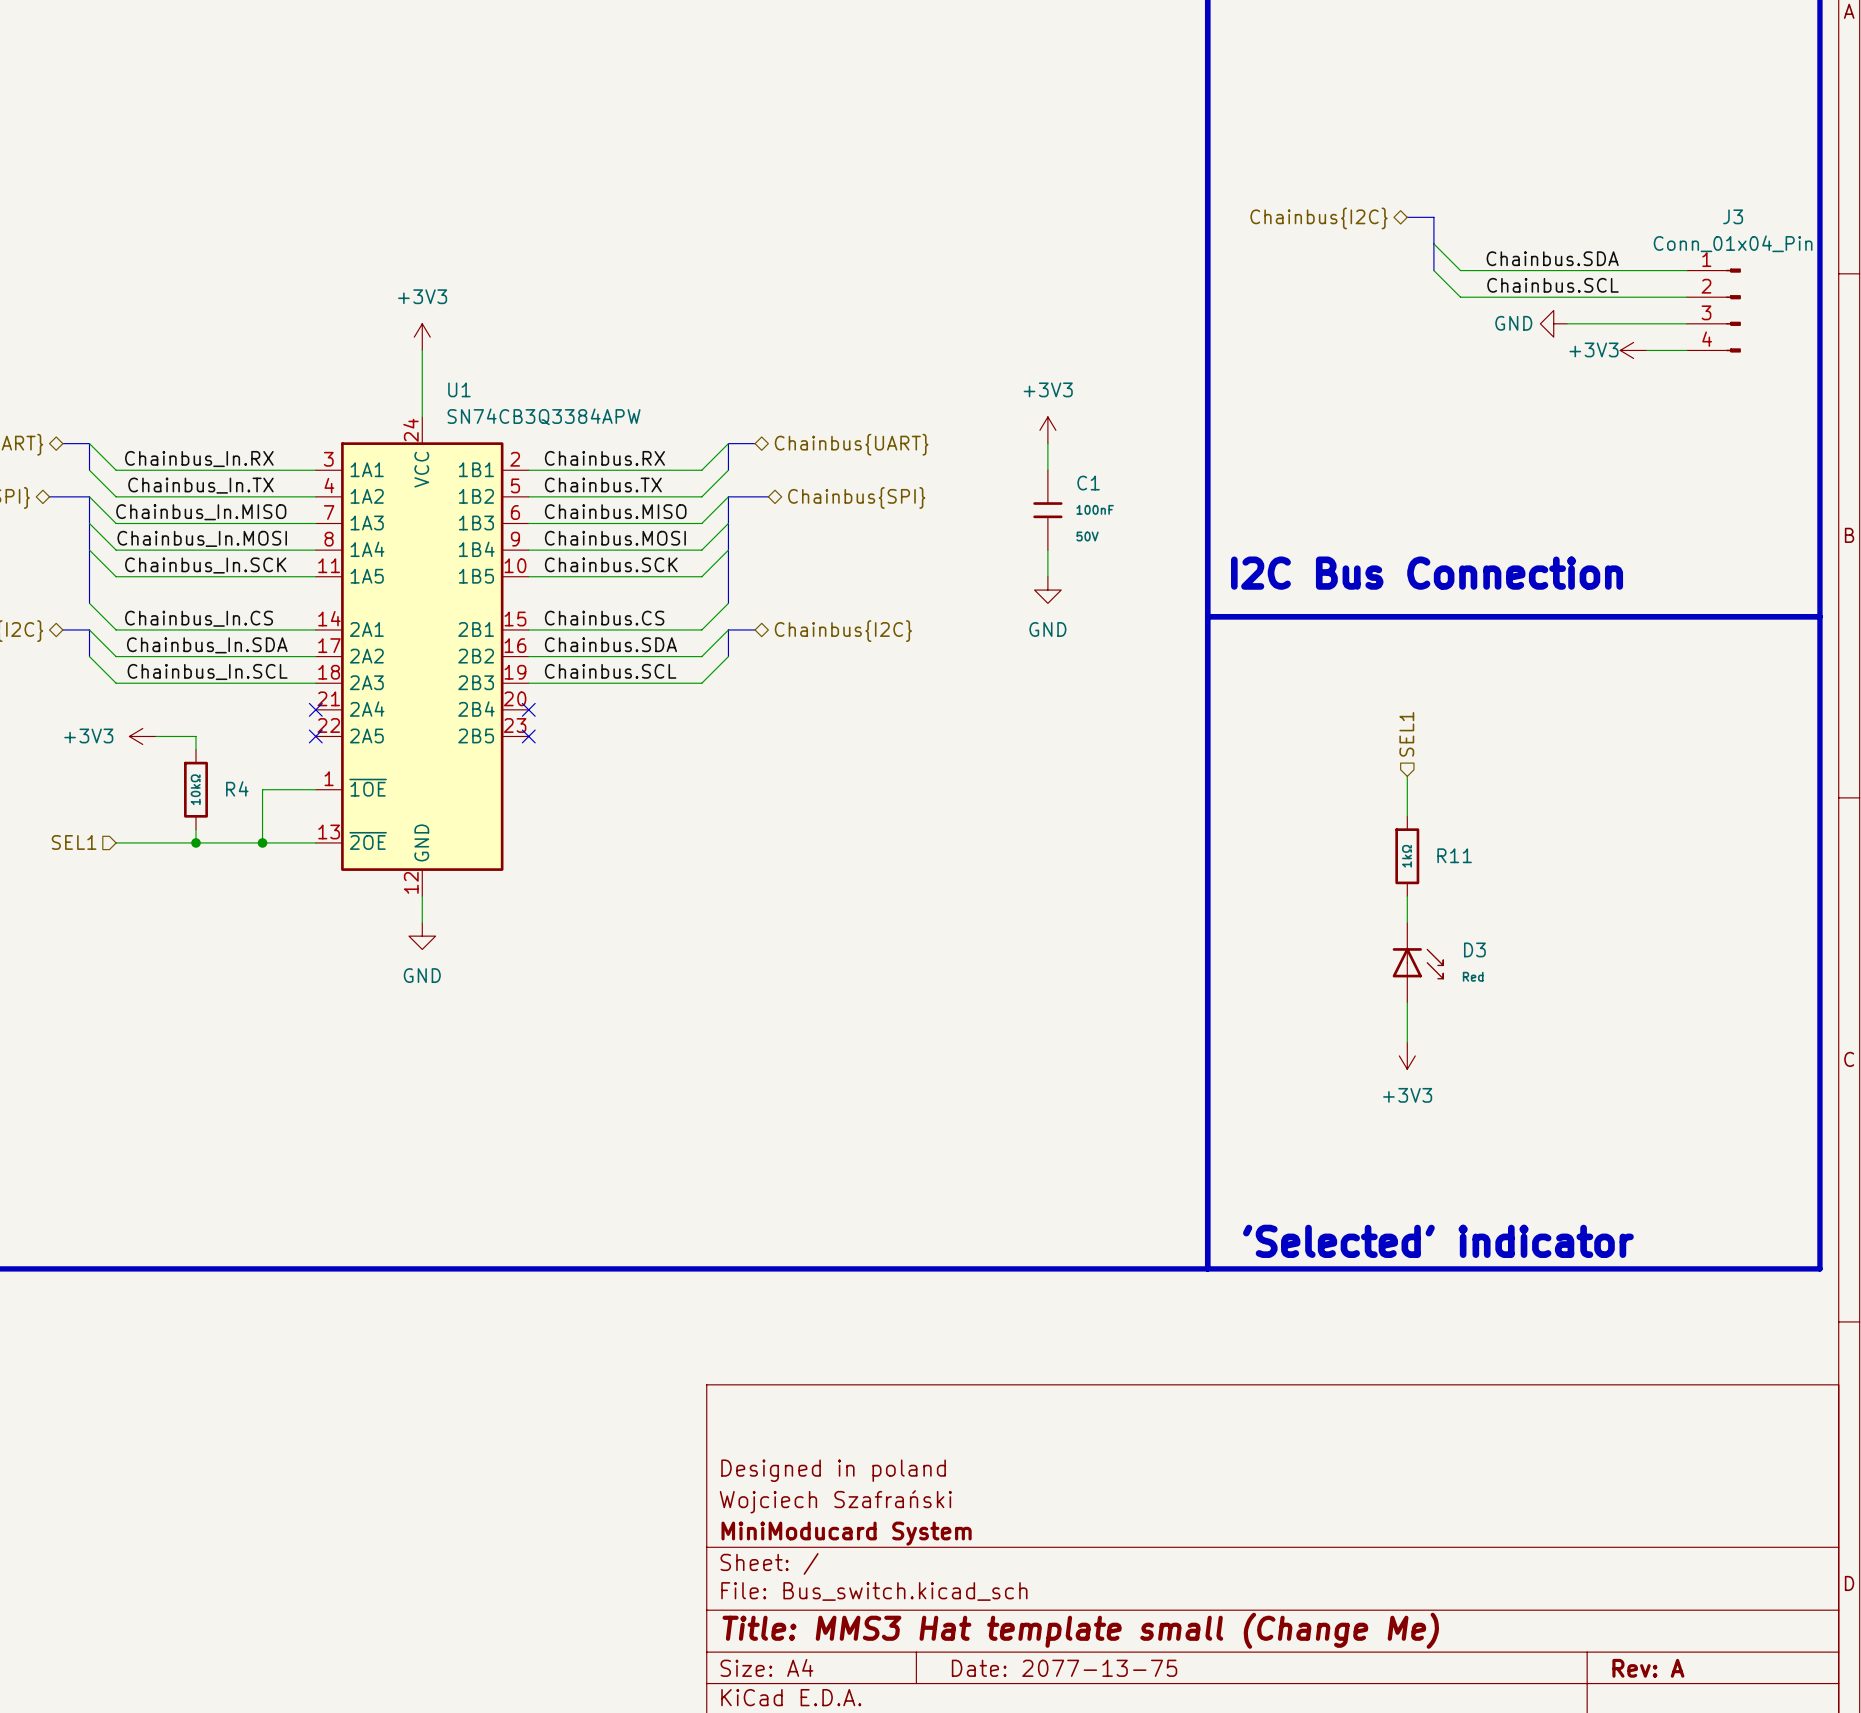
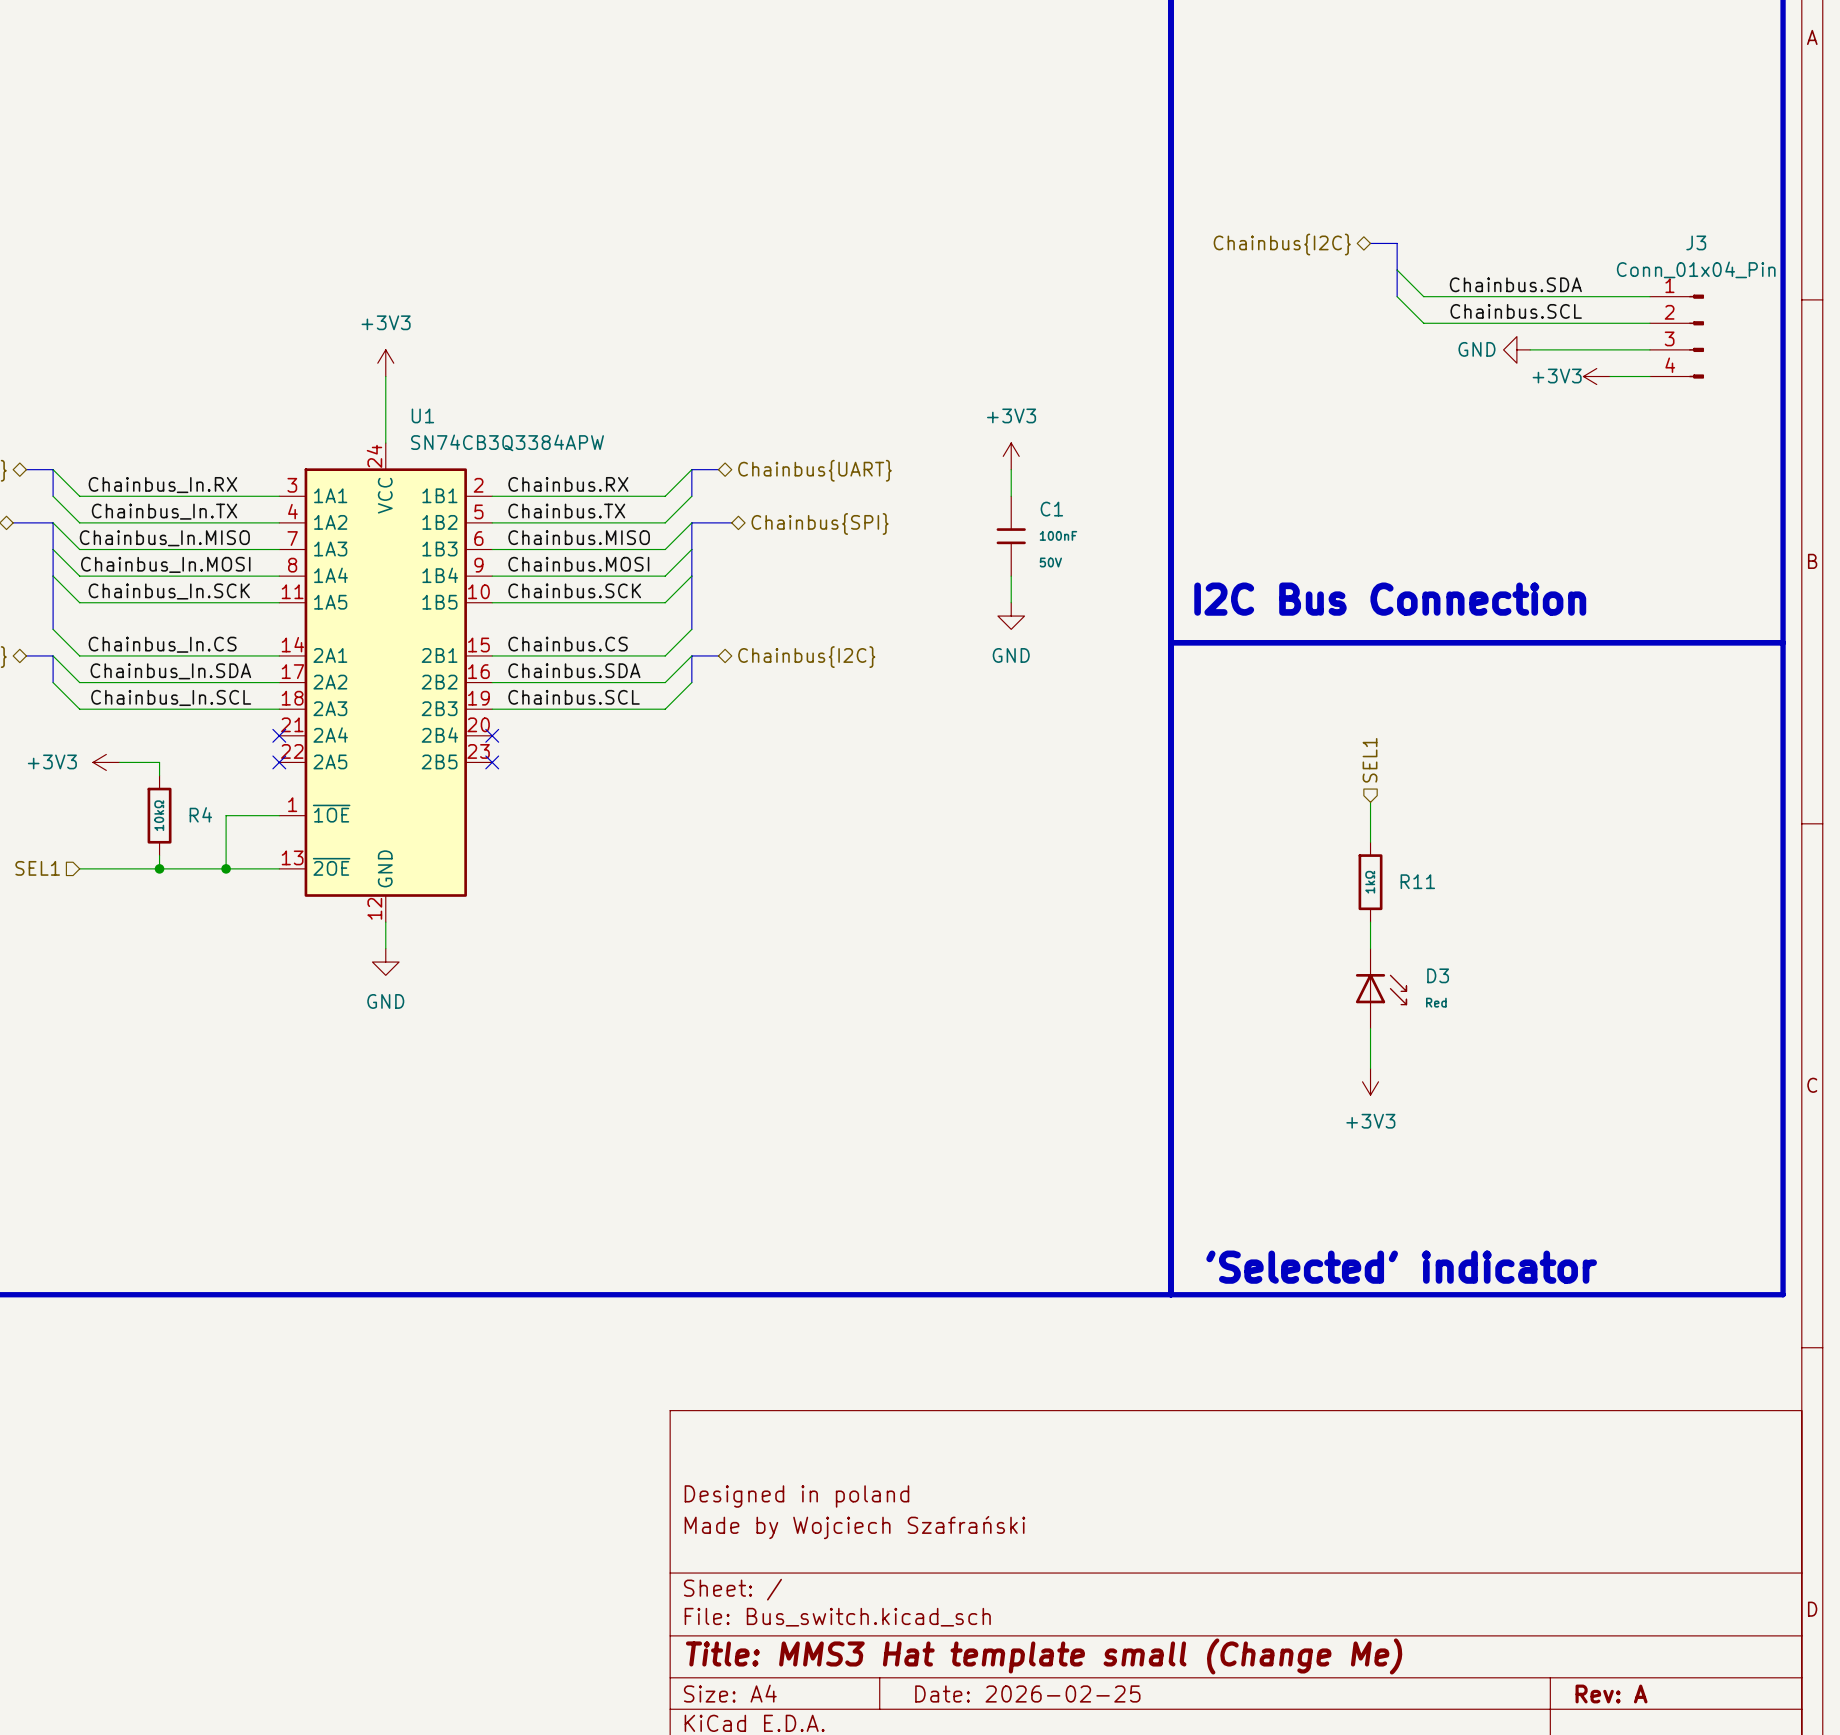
title block: Wojciech Szafrański (835, 1501) -> Made by Wojciech Szafrański (854, 1527)
title block: MiniModucard System (846, 1533) -> none
title block: Date: 2077-13-75 (1064, 1668) -> Date: 2026-02-25 (1027, 1693)

